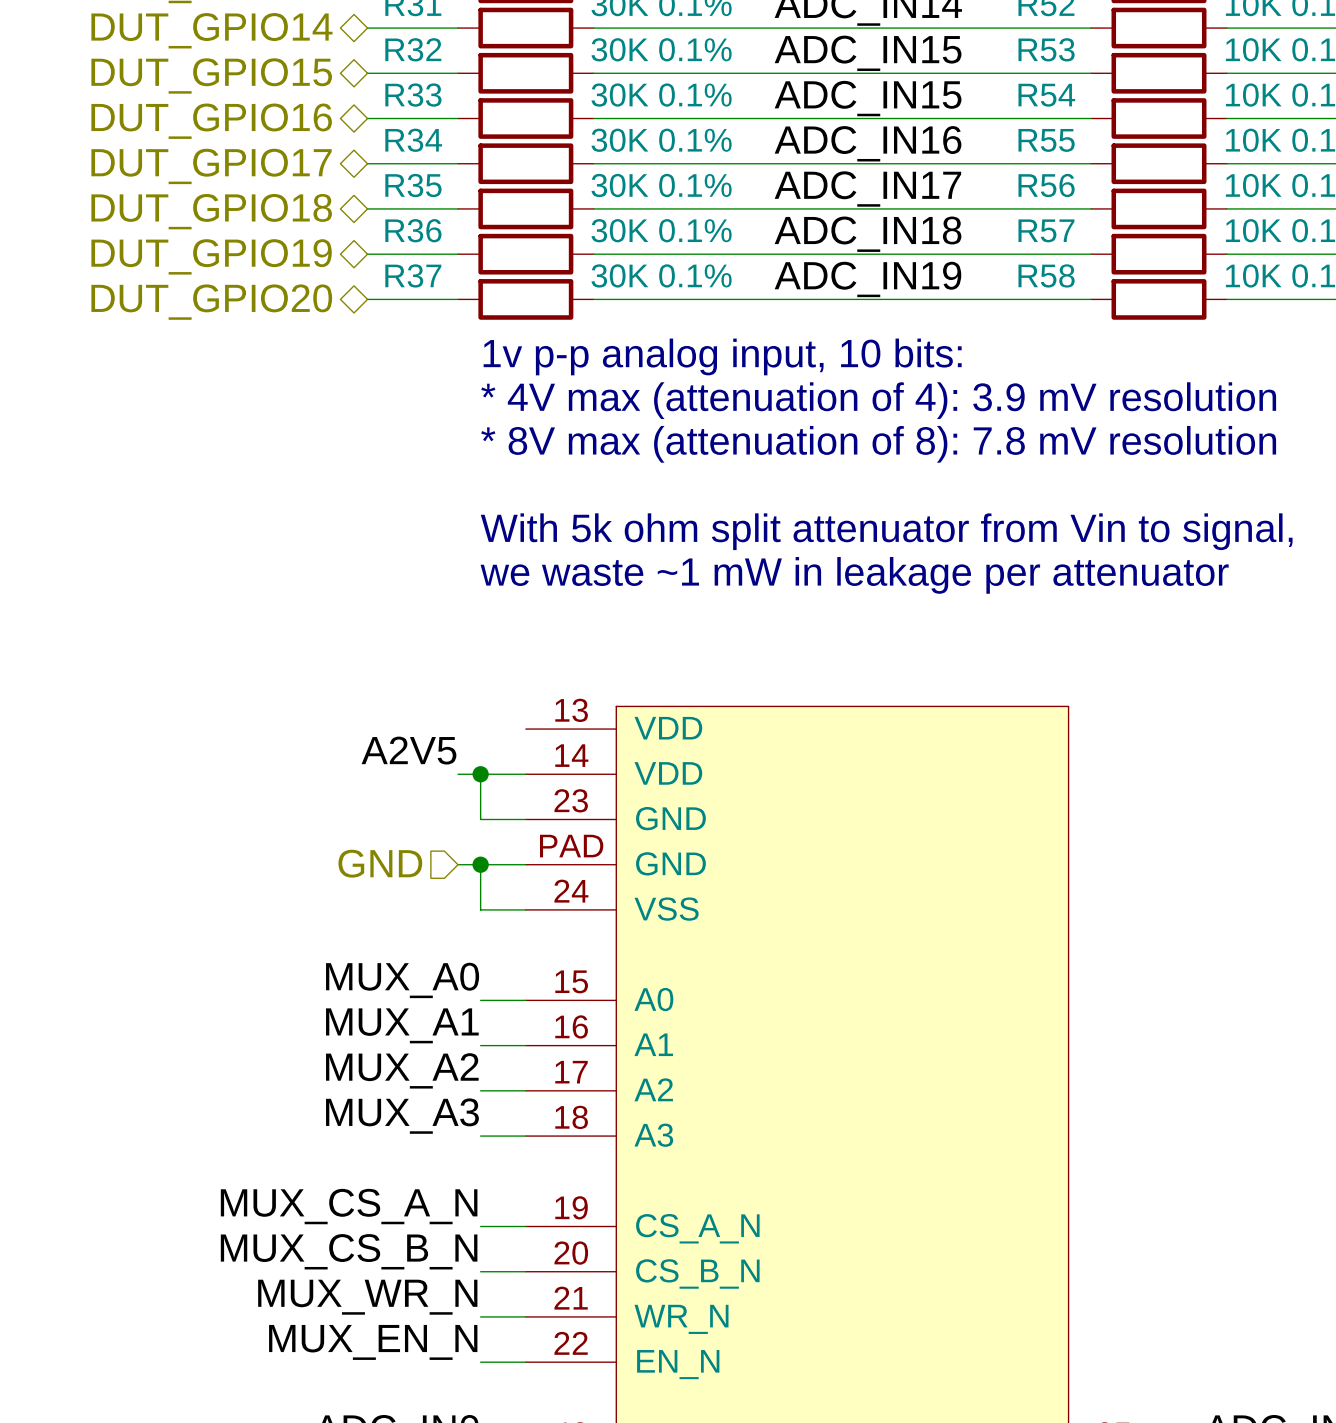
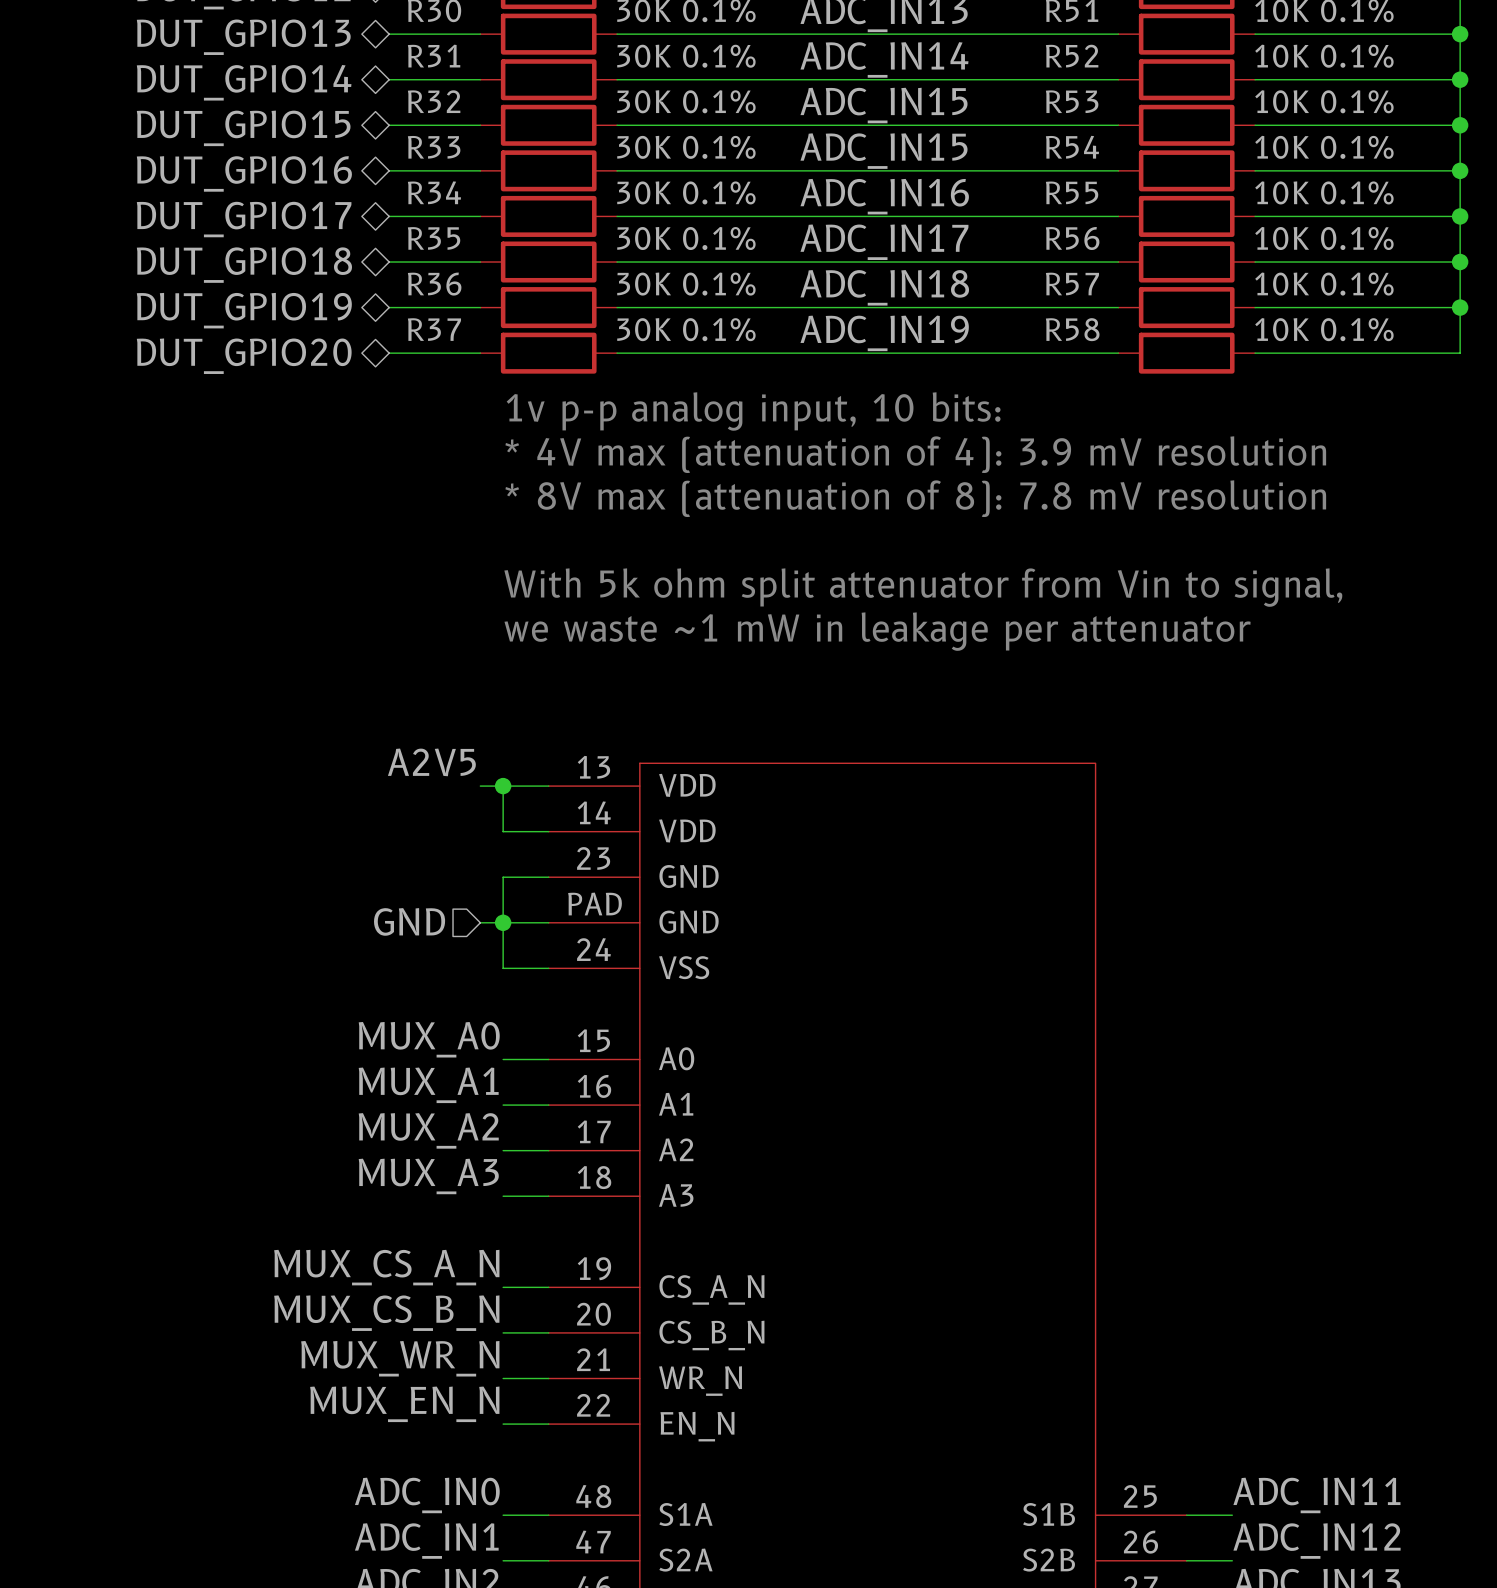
wire: none -> (480, 786) (548, 786)
wire: none -> (503, 786) (503, 831)
label position: A2V5 (408, 750) -> A2V5 (431, 762)
wire: (458, 774) (480, 774) (480, 819) -> (503, 922) (503, 877)
junction position: (480, 774) -> (503, 786)

